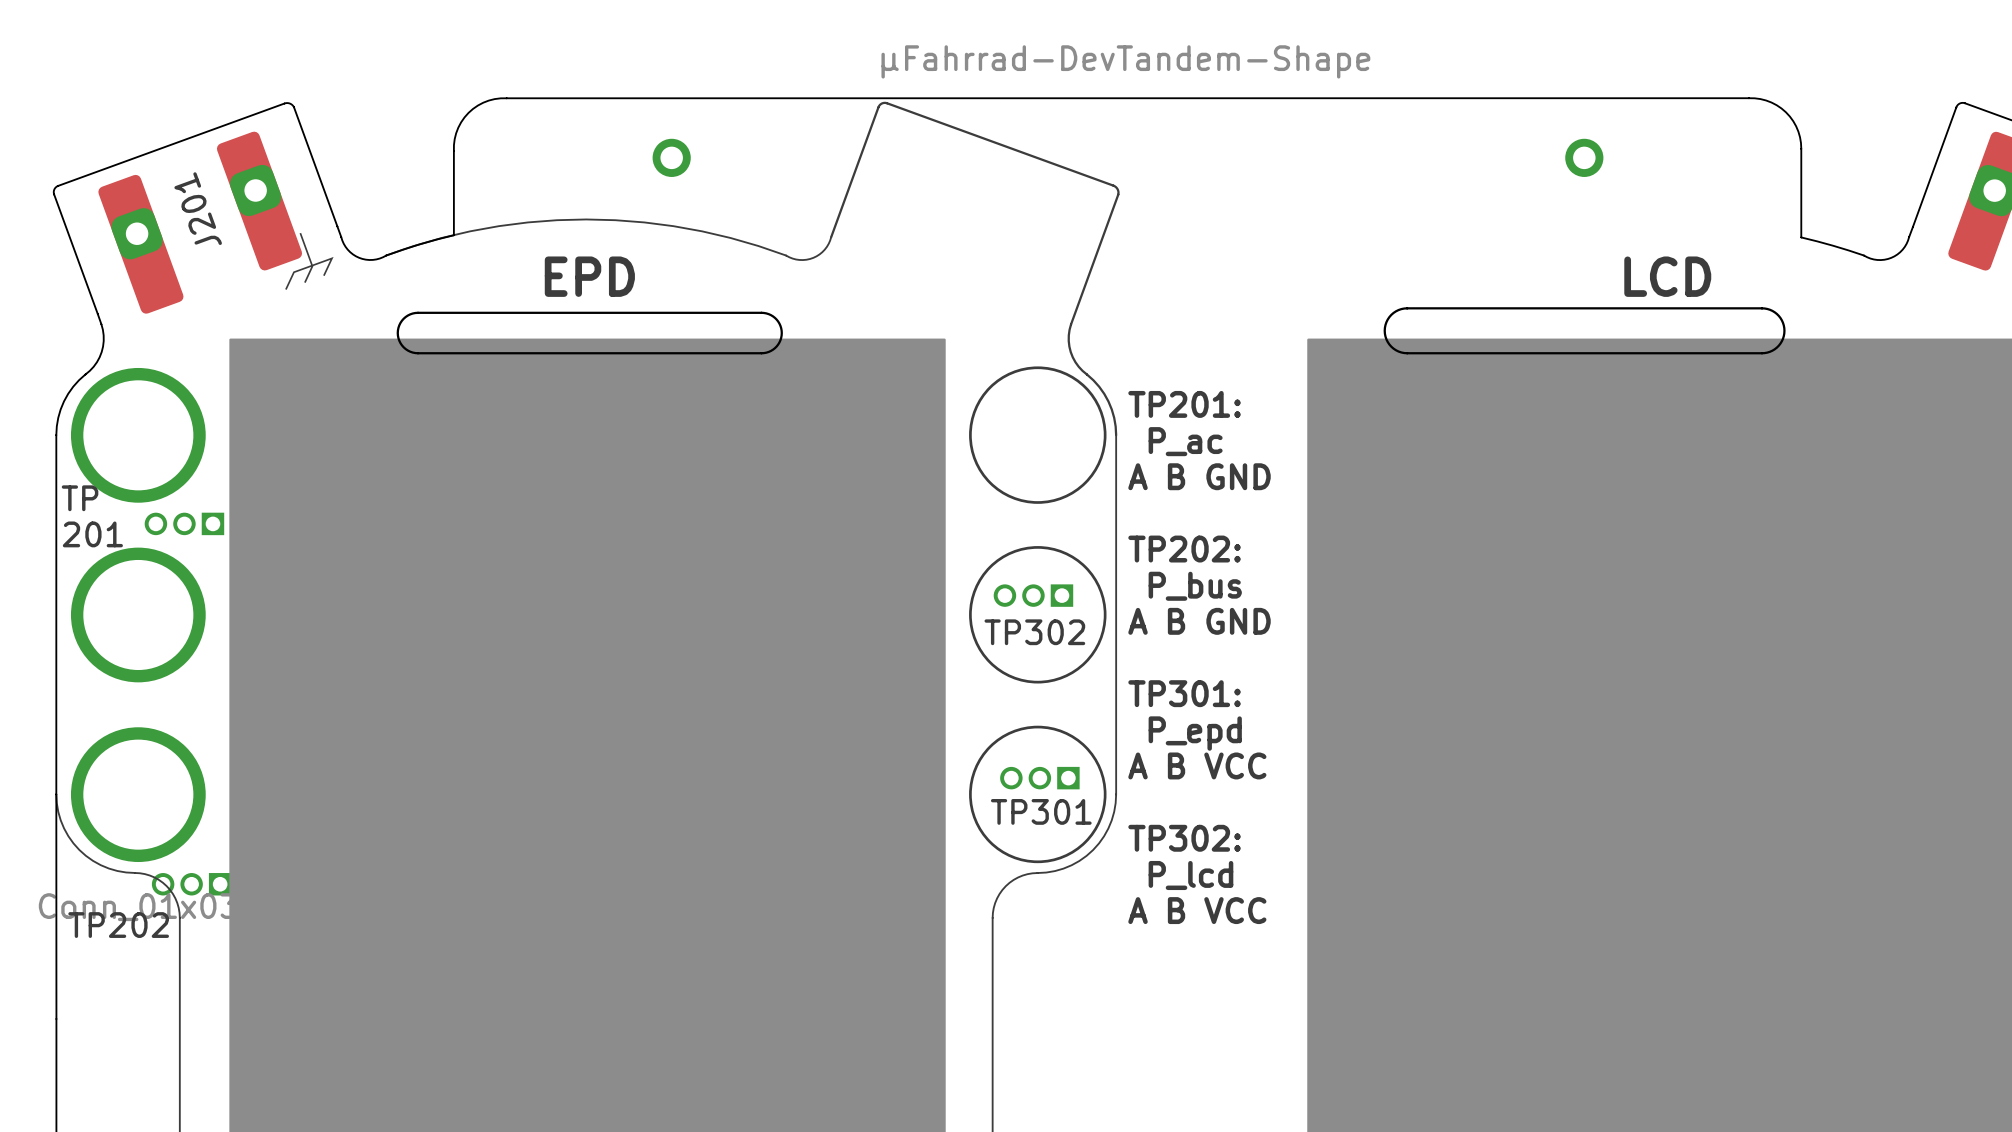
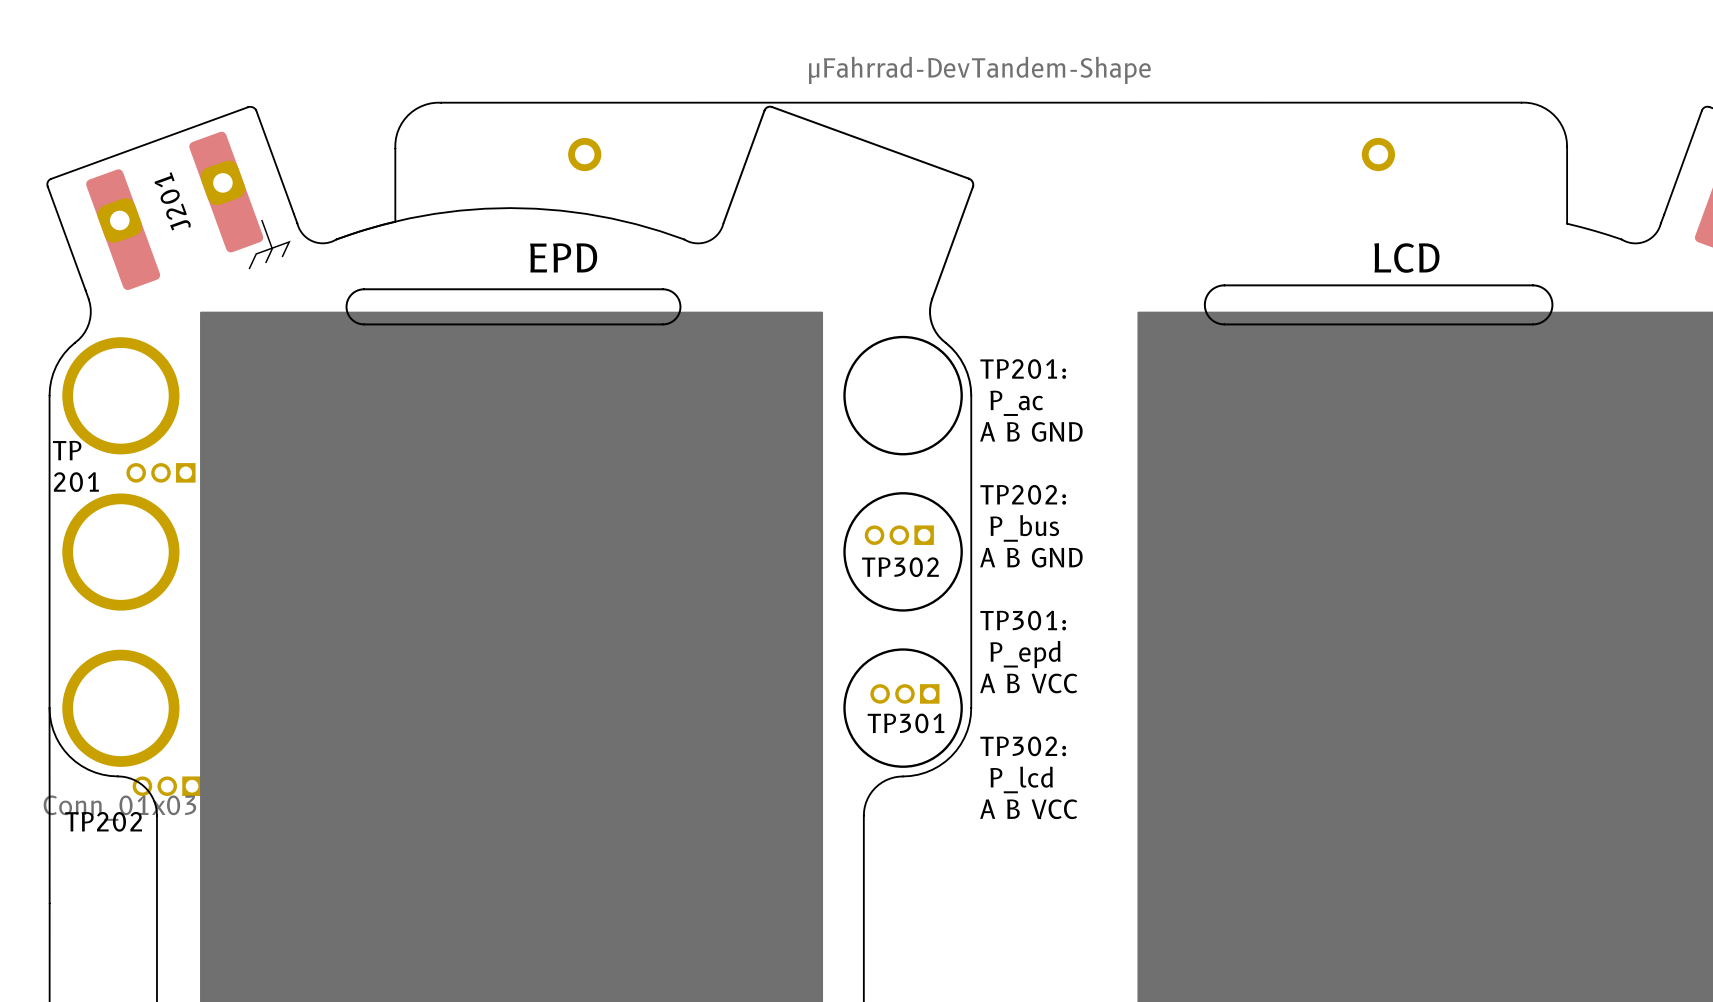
text position: EPD (589, 276) -> EPD (563, 257)
text position: LCD (1667, 276) -> LCD (1406, 258)

